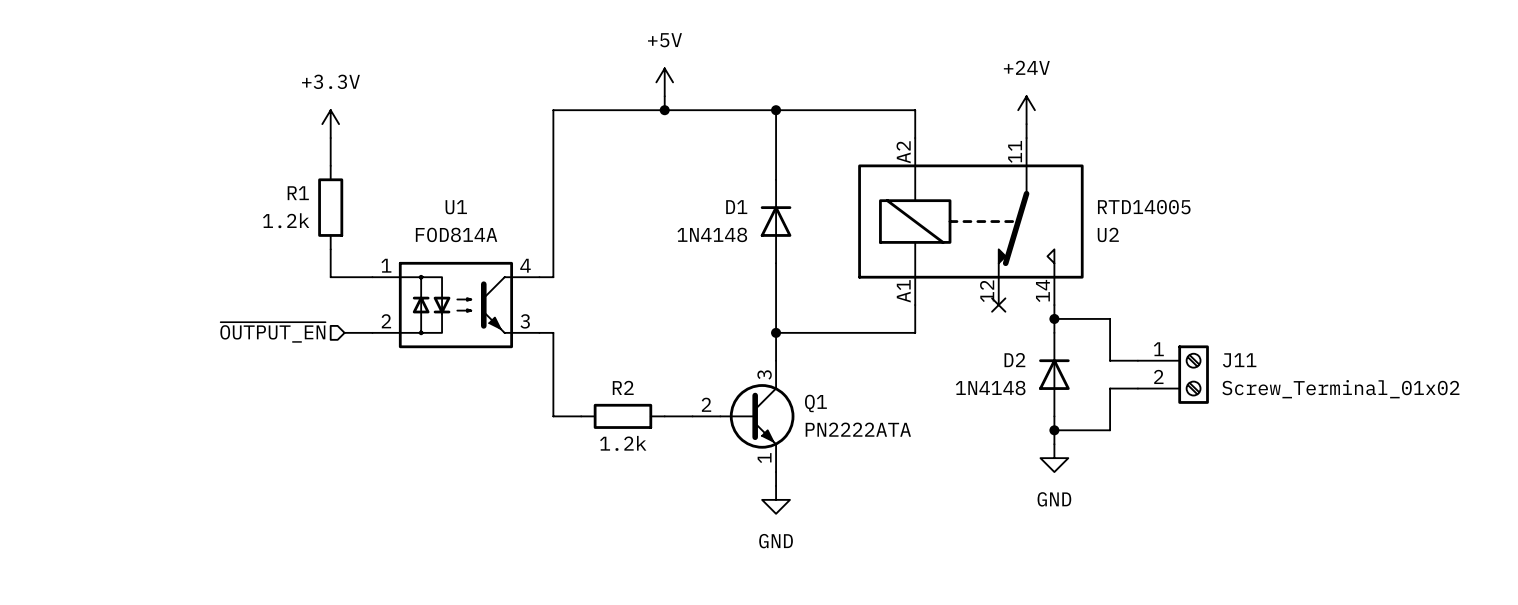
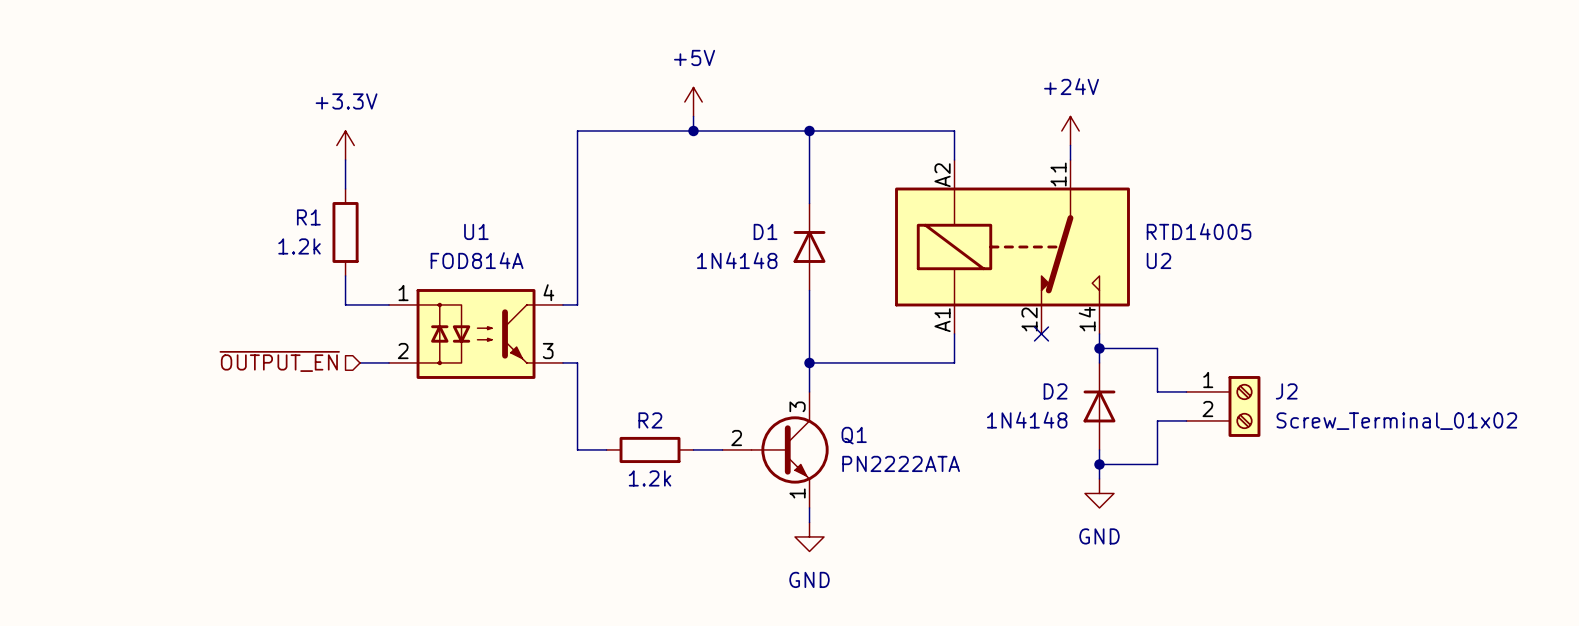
J11 name: J11 (1239, 360) -> J2 (1286, 391)

